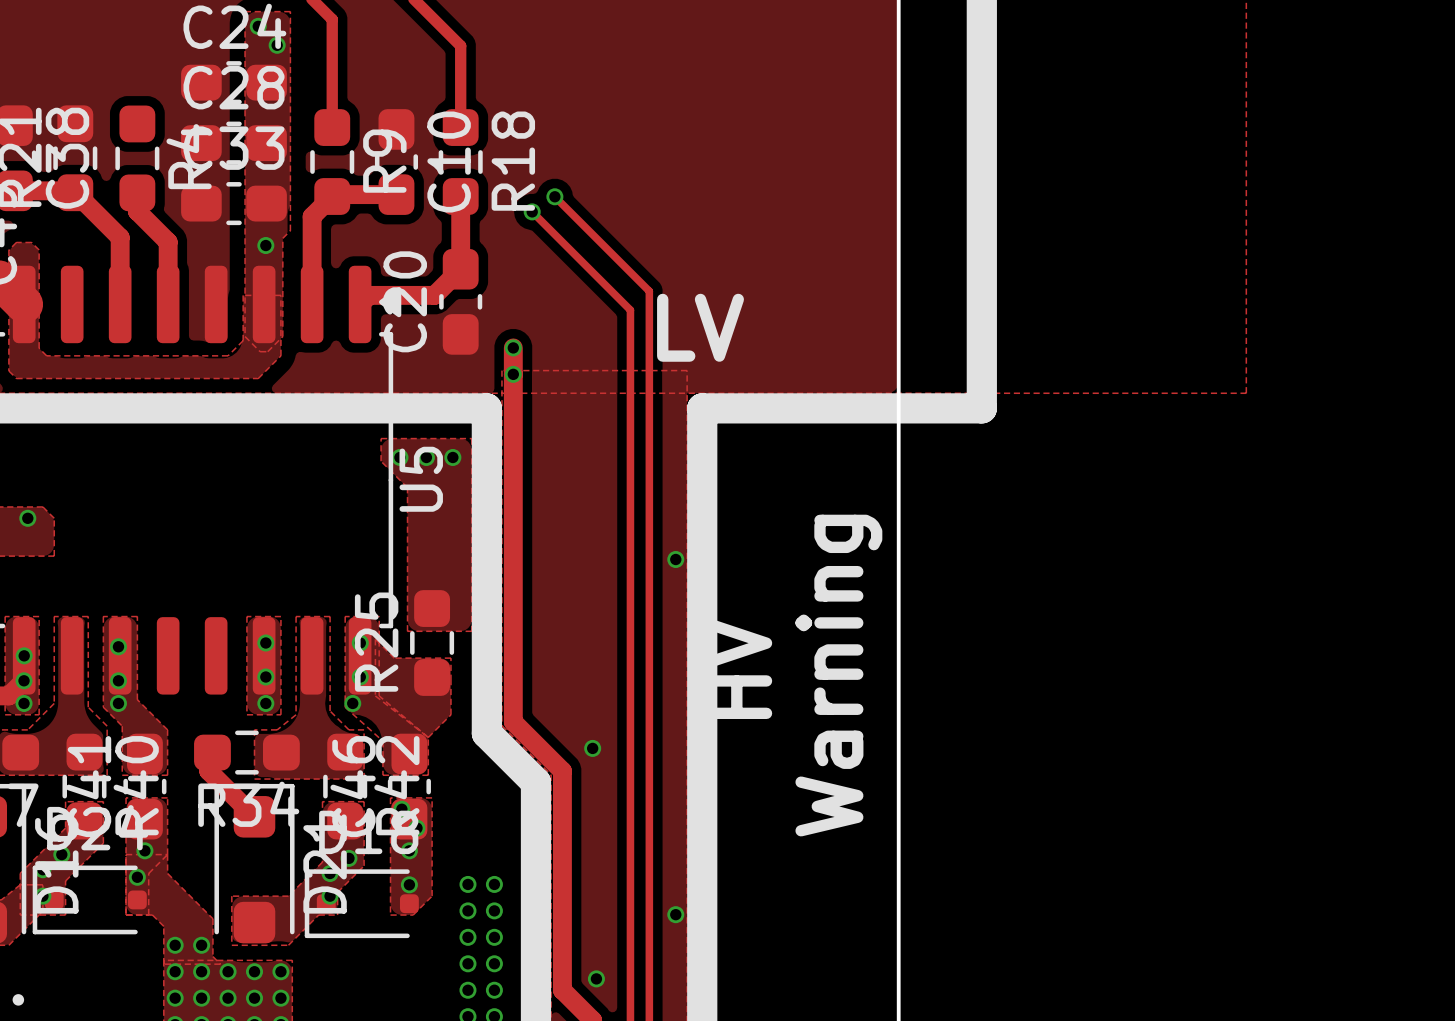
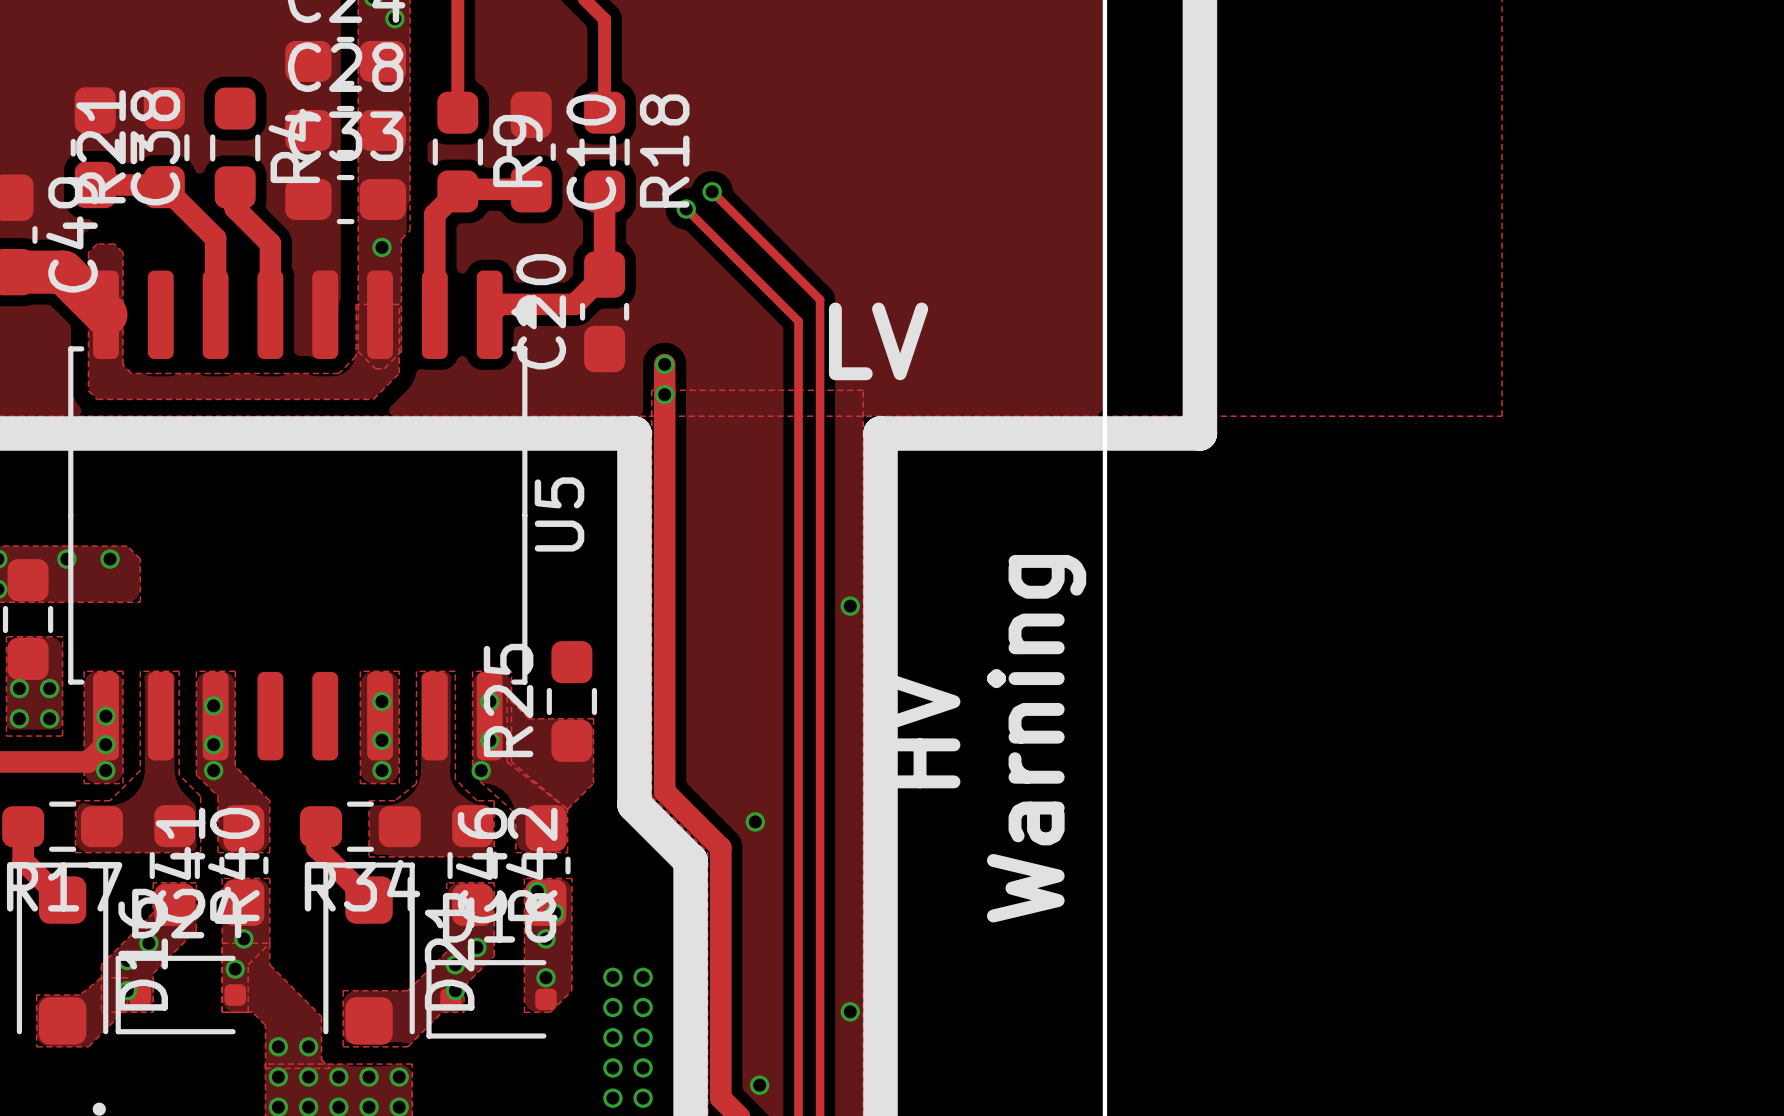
zone outline: (381, 438) (381, 461) (407, 487) (407, 631) (471, 631) (471, 438) (381, 438) -> none
via: (399, 457) -> none
via: (426, 457) -> none
via: (452, 457) -> none

